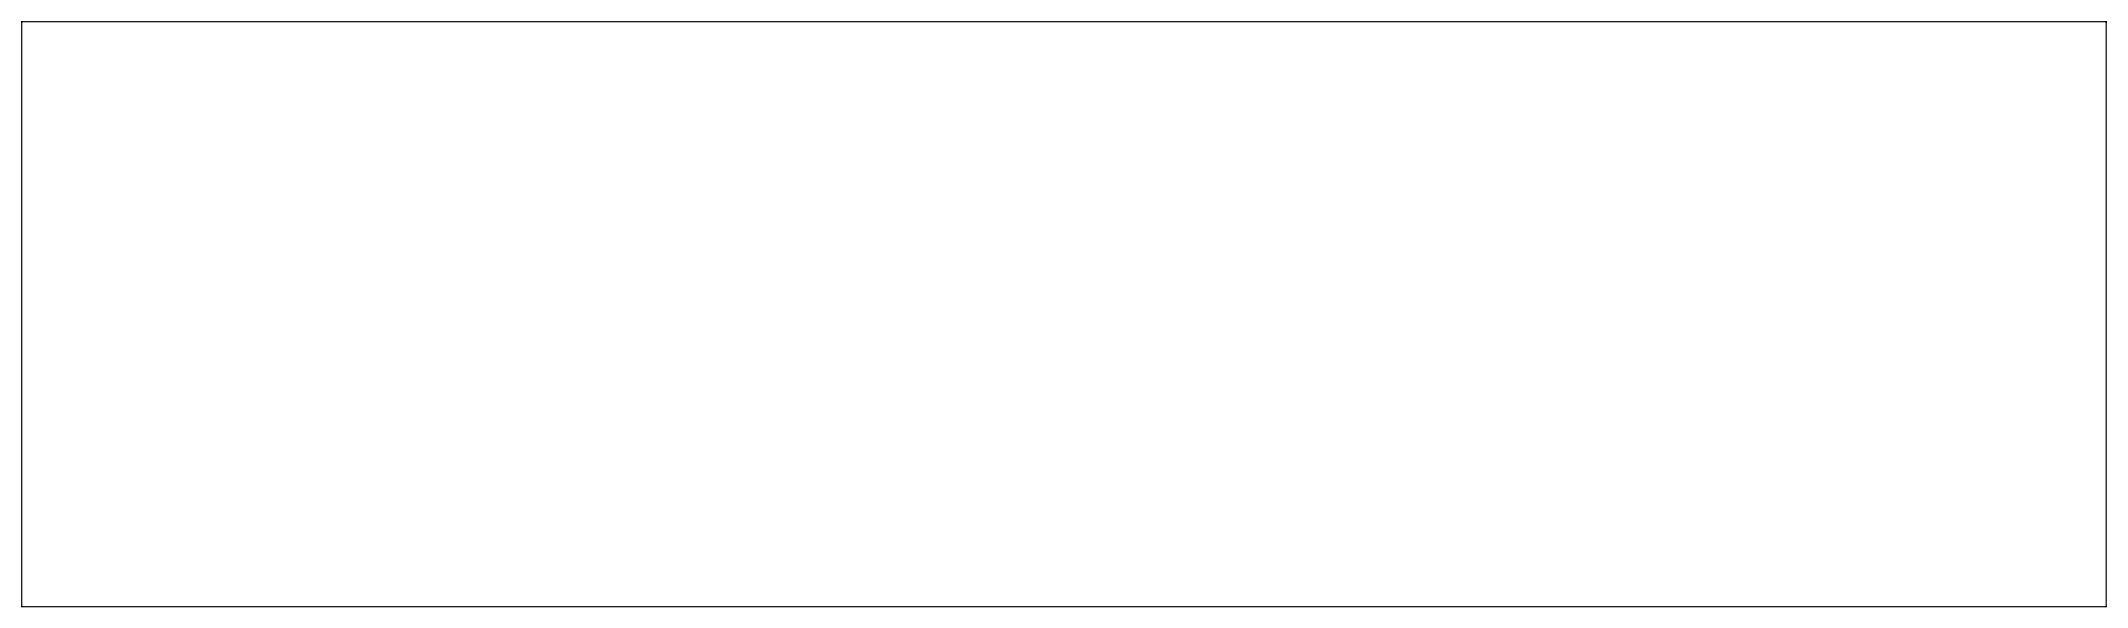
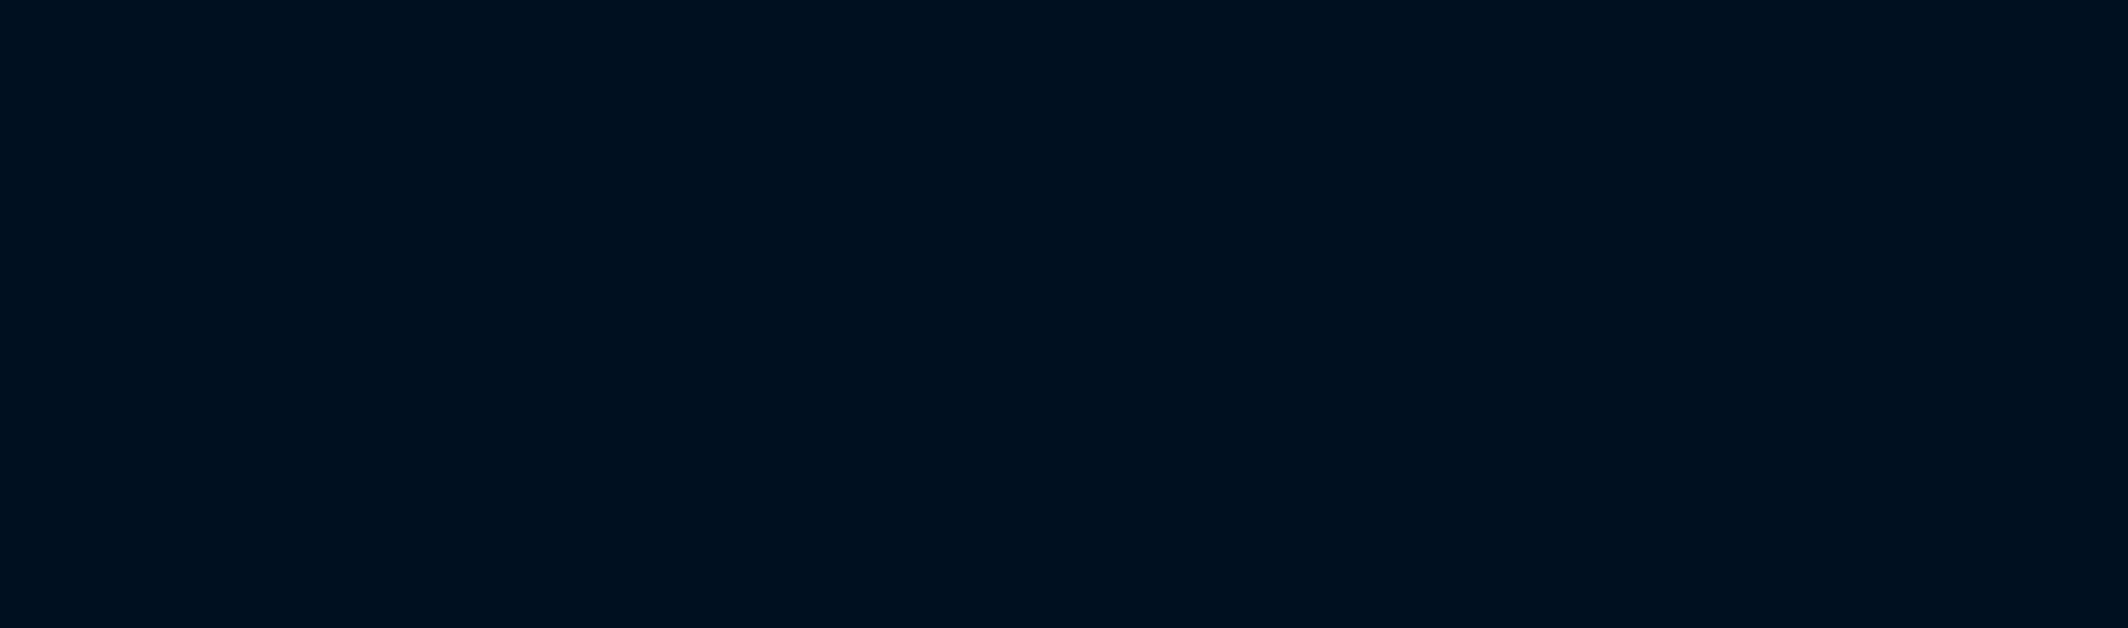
board edge: (21, 21) (2106, 21) (2106, 606) (21, 606) (21, 21) -> none

